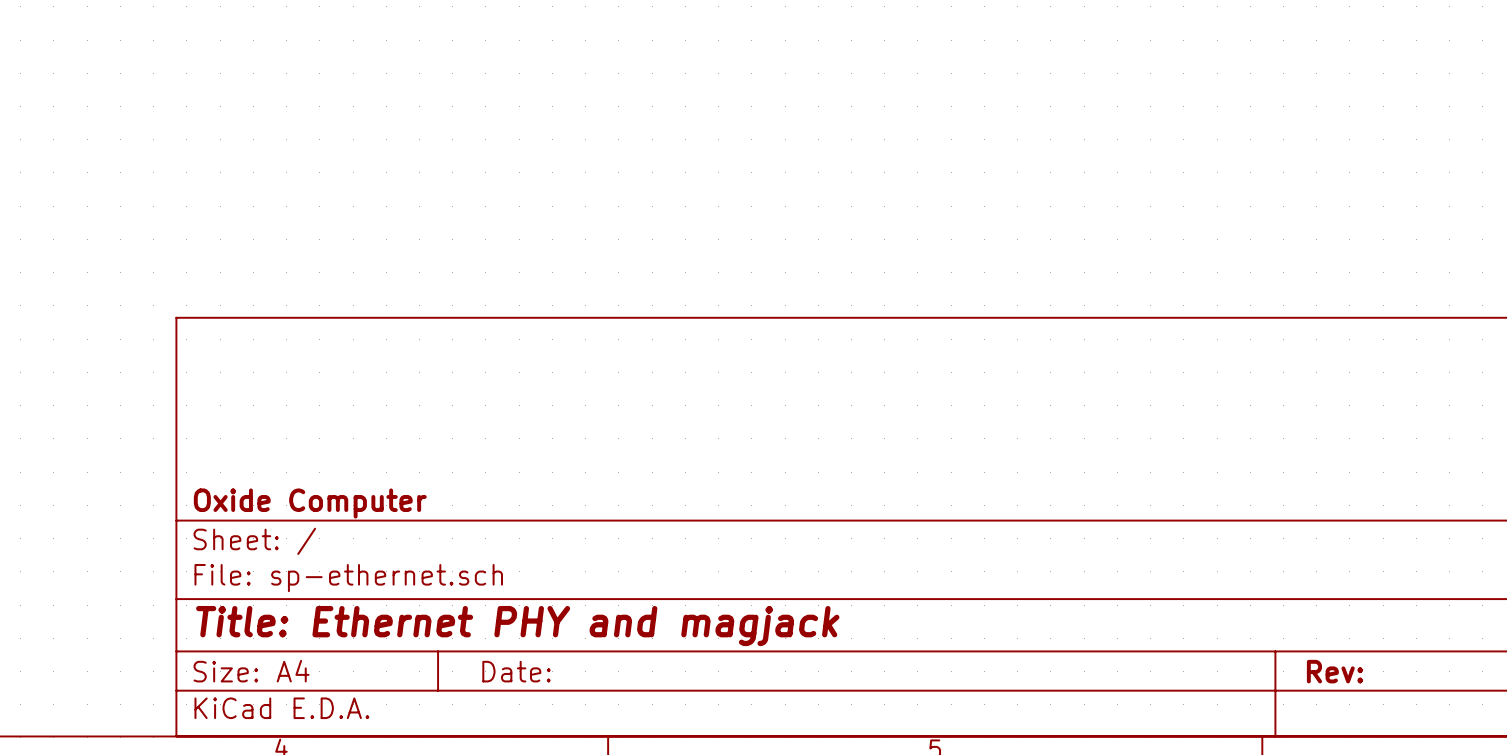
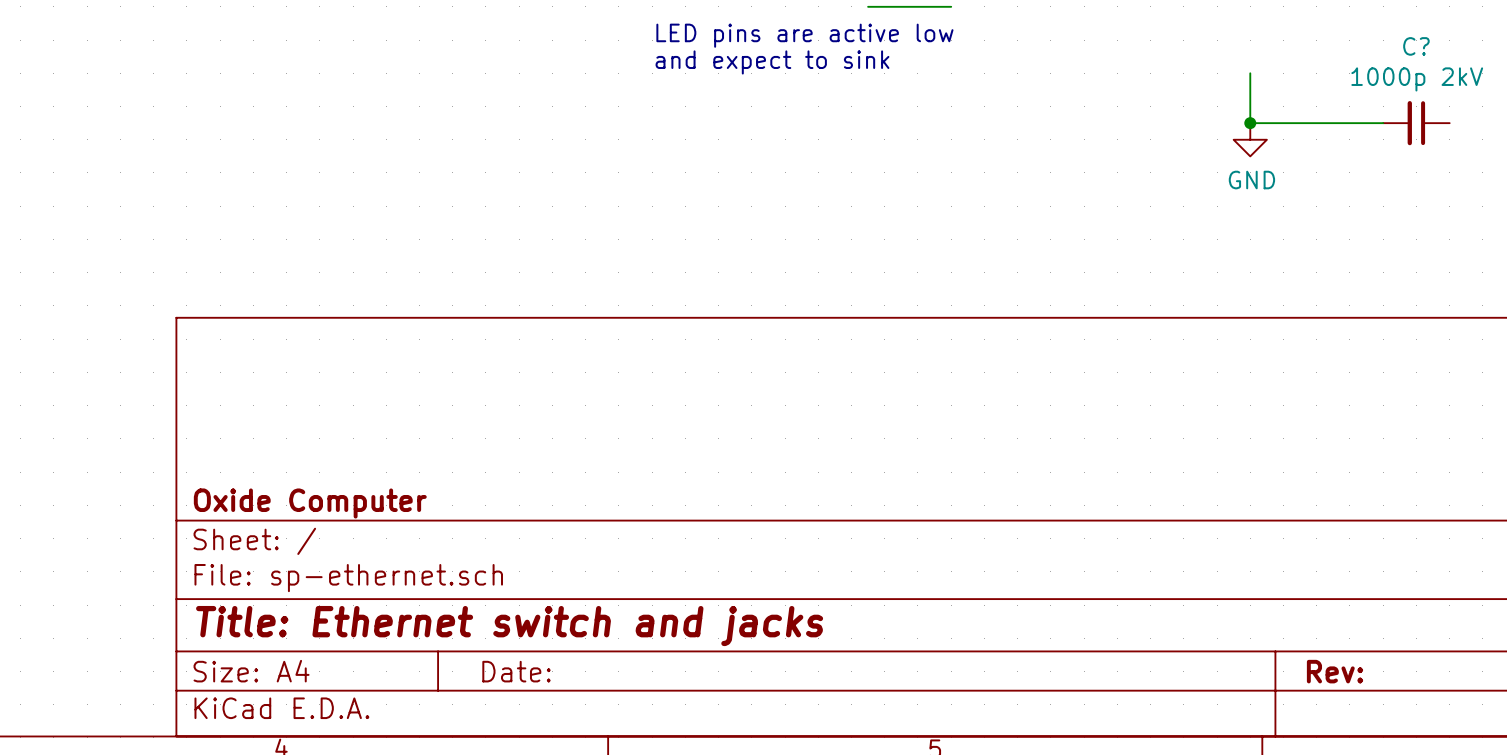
wire: none -> (868, 6) (951, 6)
text: none -> LED pins are active low (804, 35)
text: none -> and expect to sink (772, 62)
wire: none -> (1250, 73) (1250, 123) (1383, 123)
junction: none -> (1250, 123)
C?: none -> 1000p 2kV (1416, 123)
power symbol: none -> GND (1250, 139)
title block: Title: Ethernet PHY and magjack (517, 626) -> Title: Ethernet switch and jacks (509, 626)

